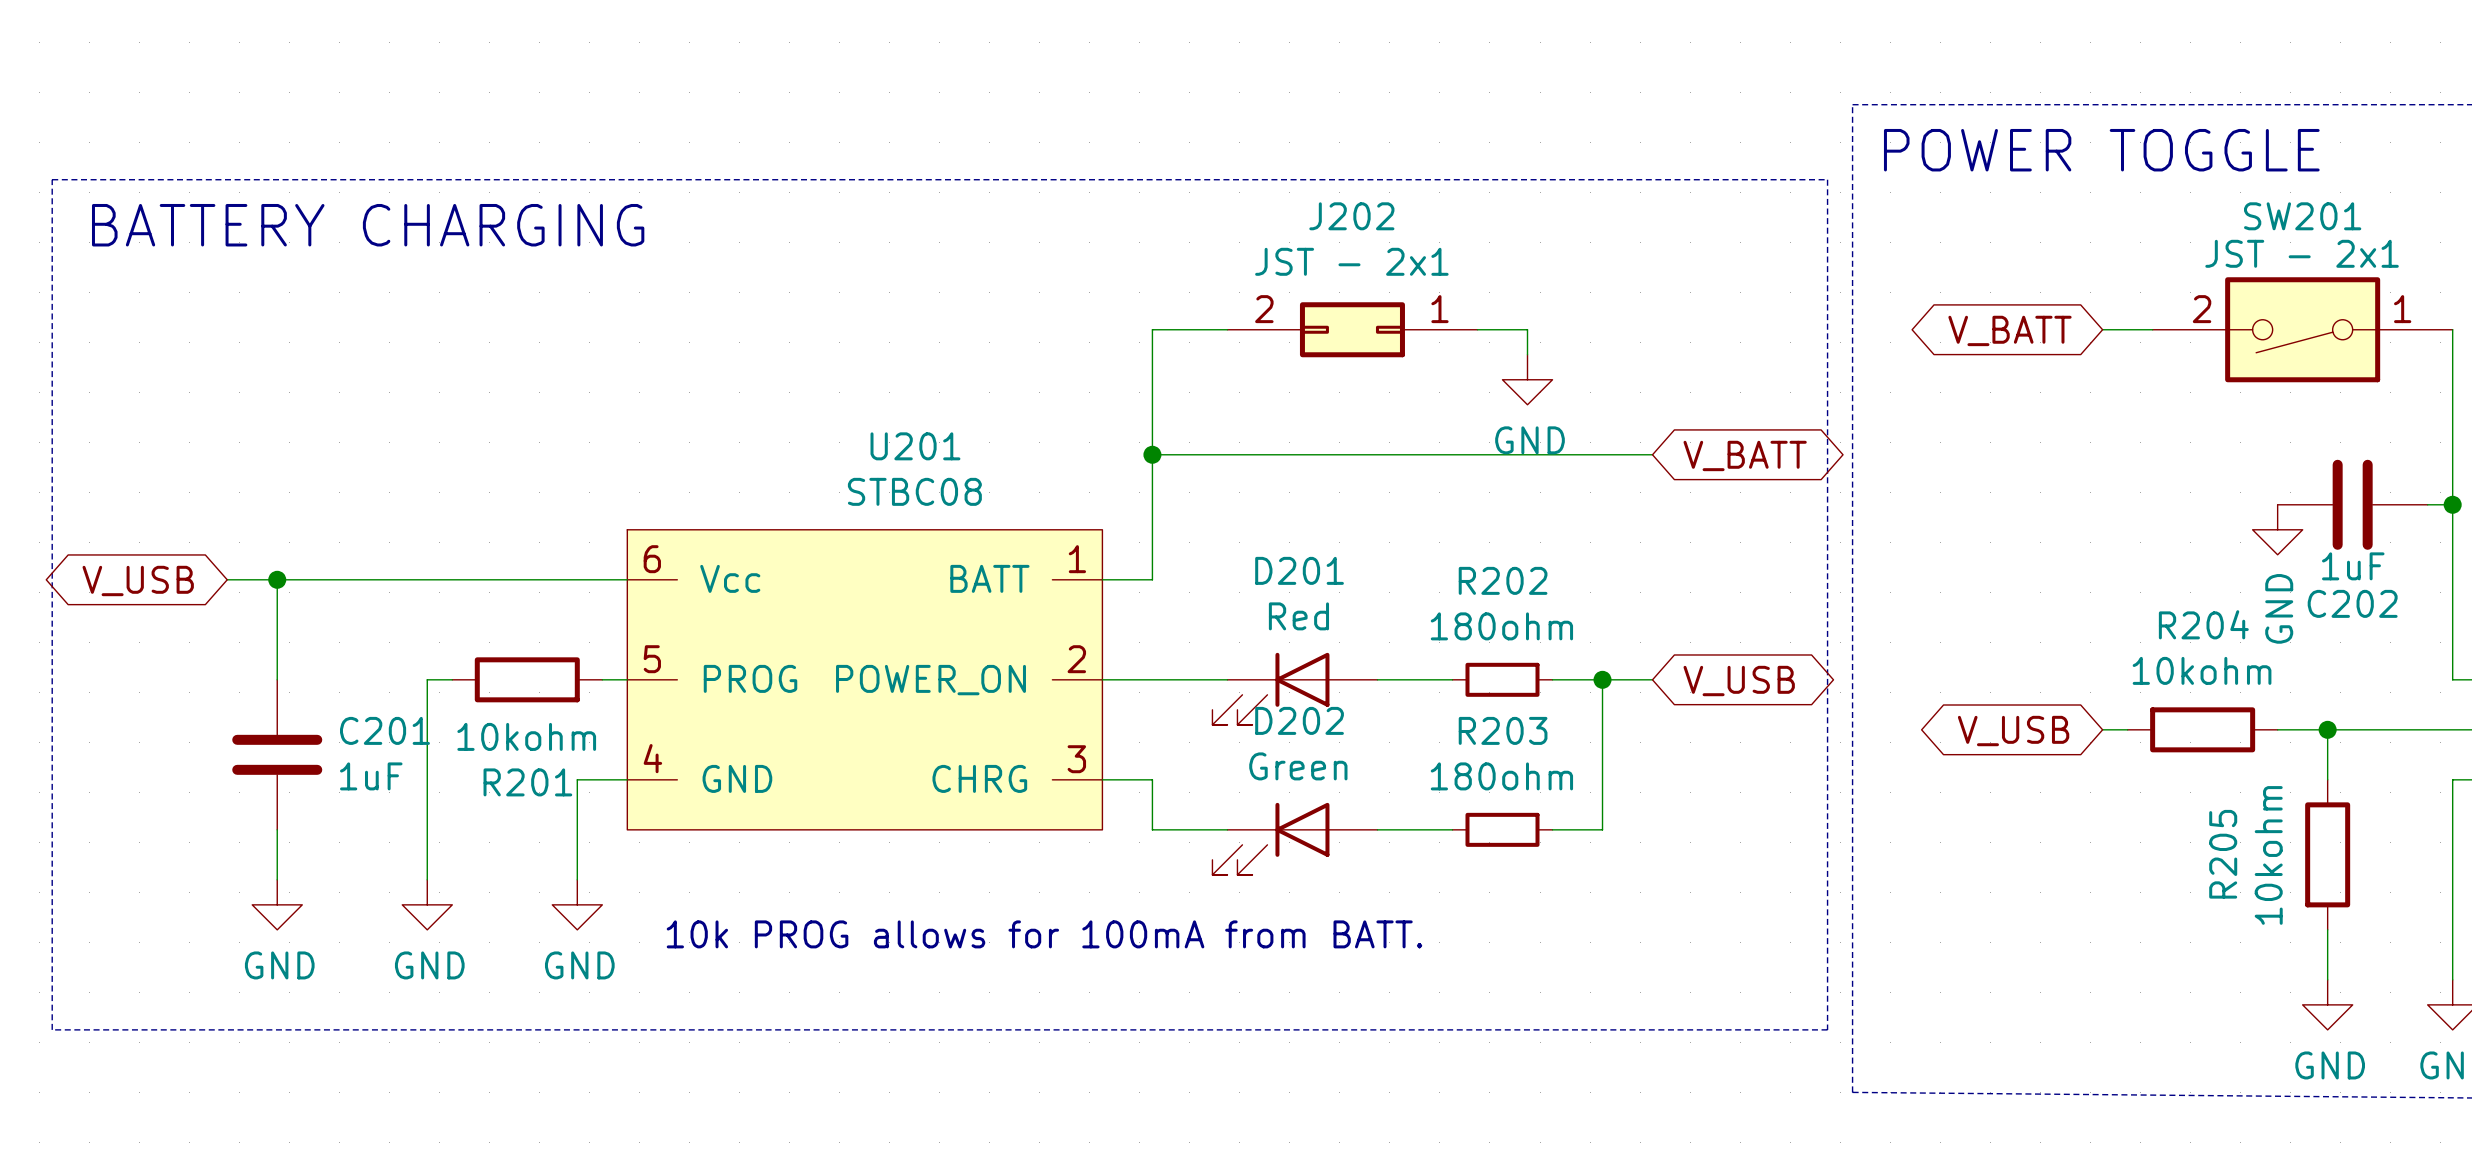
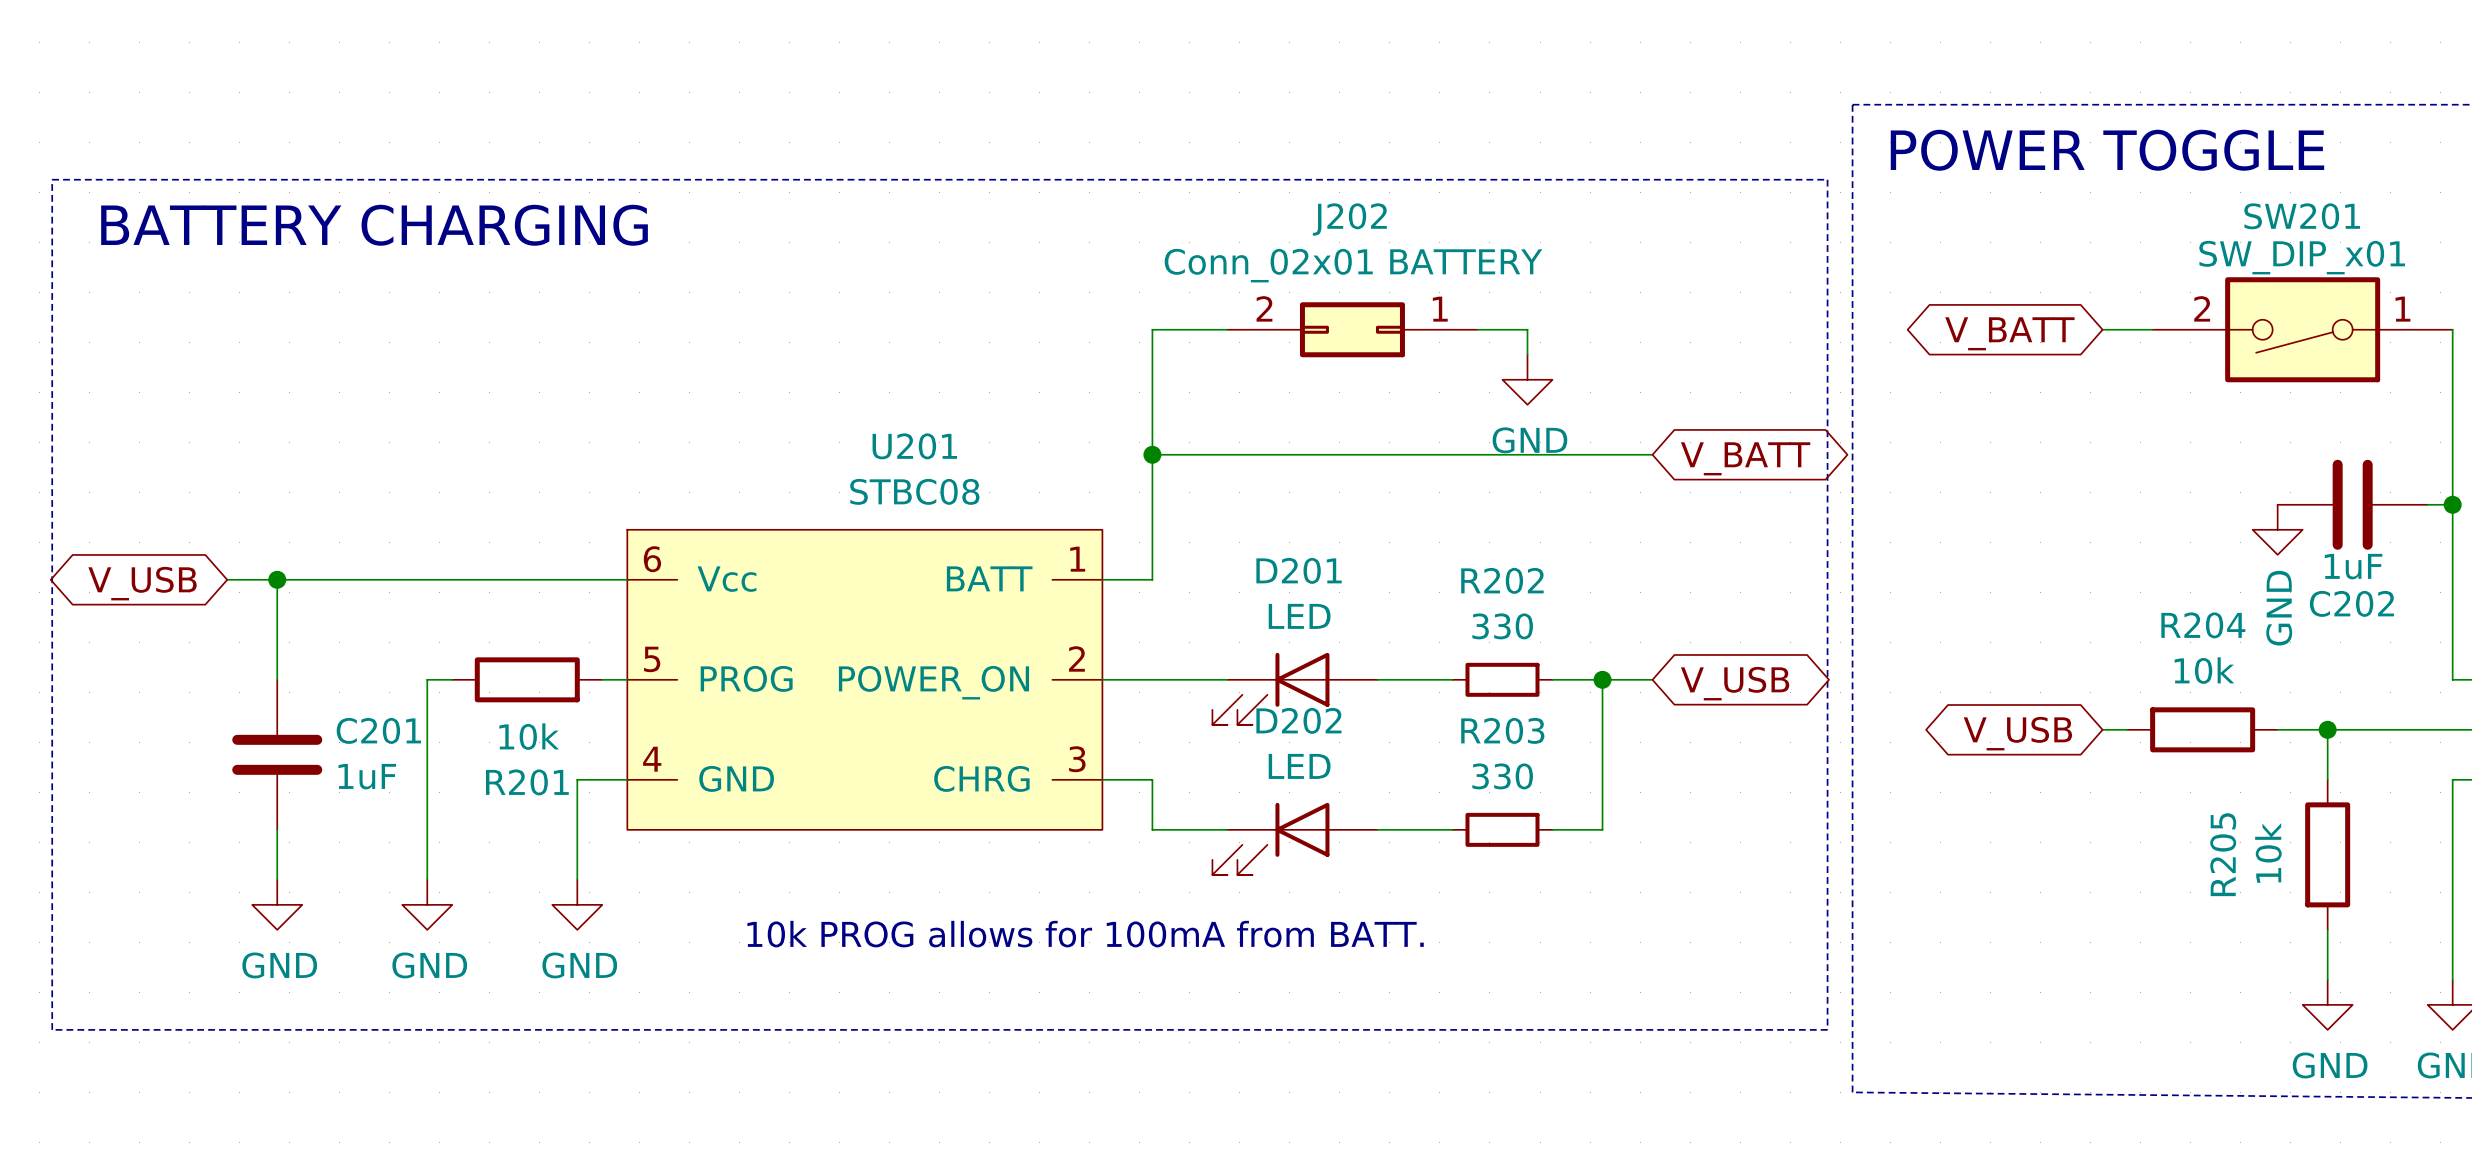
SW201 value: JST - 2x1 (2302, 253) -> SW_DIP_x01 (2302, 257)
J202 value: JST - 2x1 (1351, 261) -> Conn_02x01 BATTERY (1353, 265)
D201 value: Red (1298, 616) -> LED (1299, 616)
R202 value: 180ohm (1501, 626) -> 330 (1502, 626)
R204 value: 10kohm (2202, 670) -> 10k (2204, 670)
R201 value: 10kohm (526, 736) -> 10k (529, 736)
D202 value: Green (1298, 766) -> LED (1299, 766)
R203 value: 180ohm (1501, 776) -> 330 (1502, 776)
R205 value: 10kohm (2268, 855) -> 10k (2268, 853)

